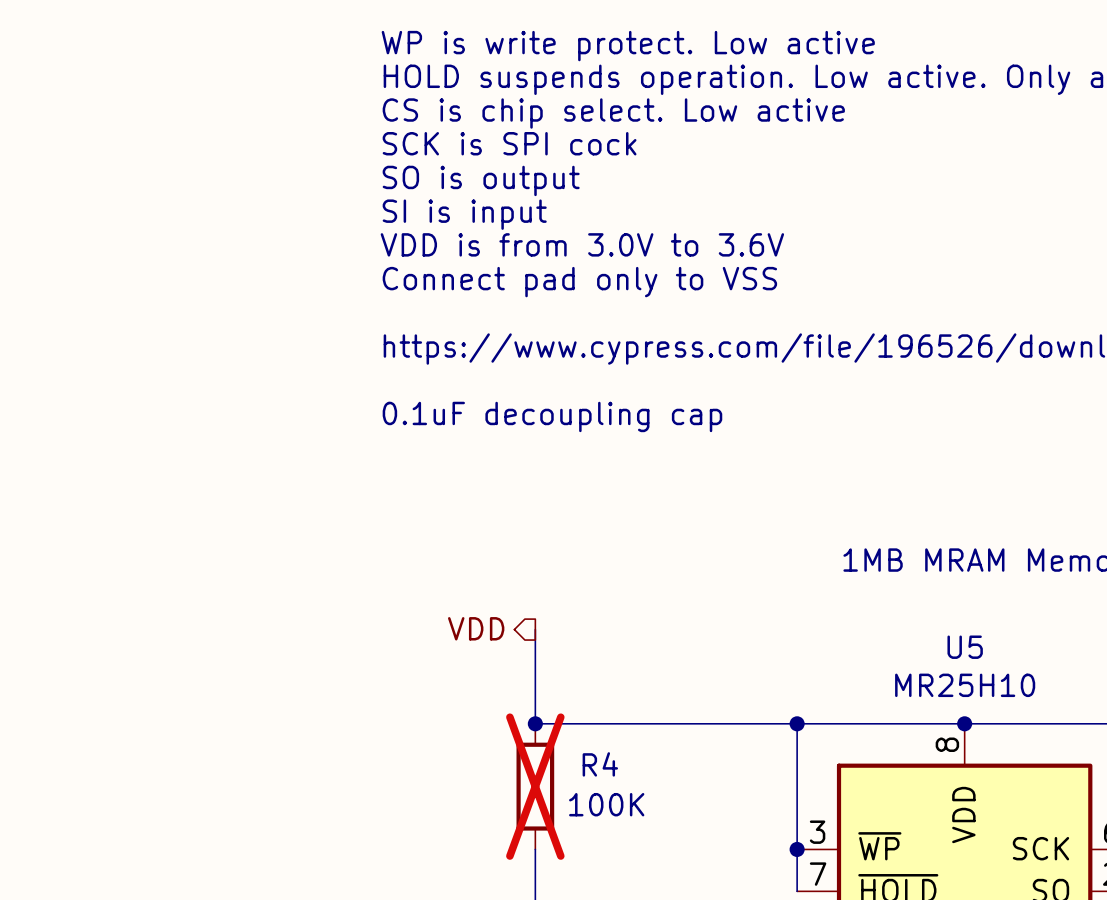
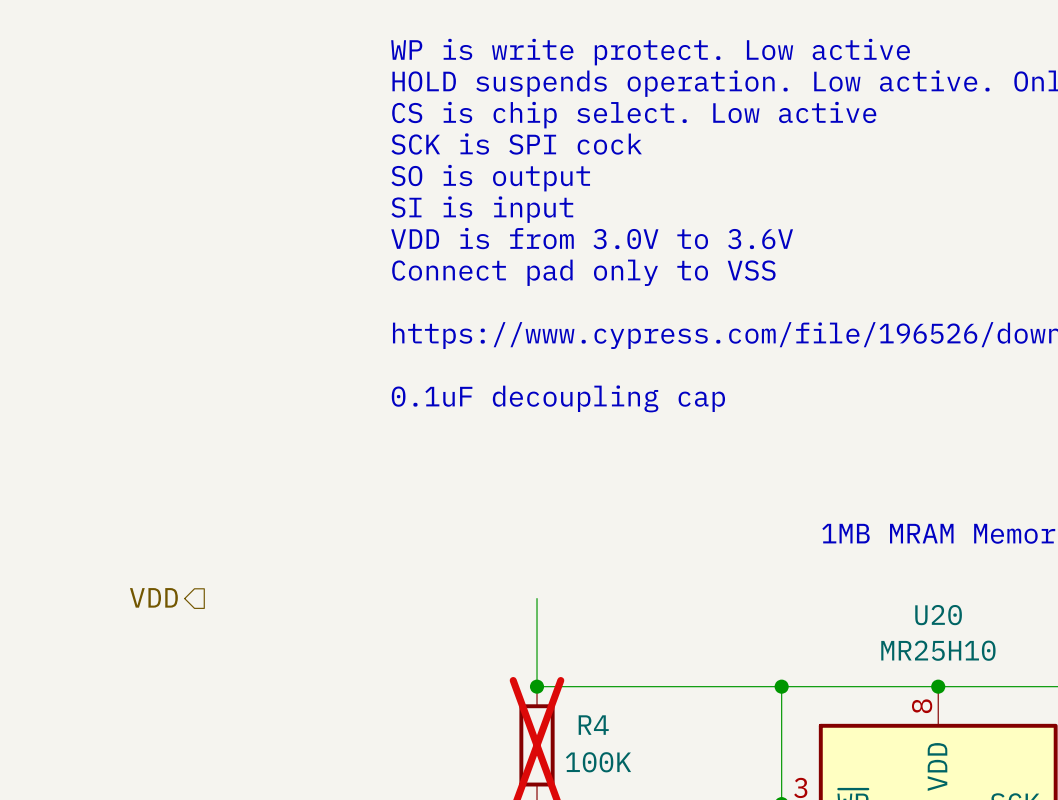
hierarchical label position: VDD (476, 628) -> VDD (153, 597)
U5 name: U5 (965, 647) -> U20 (938, 615)

